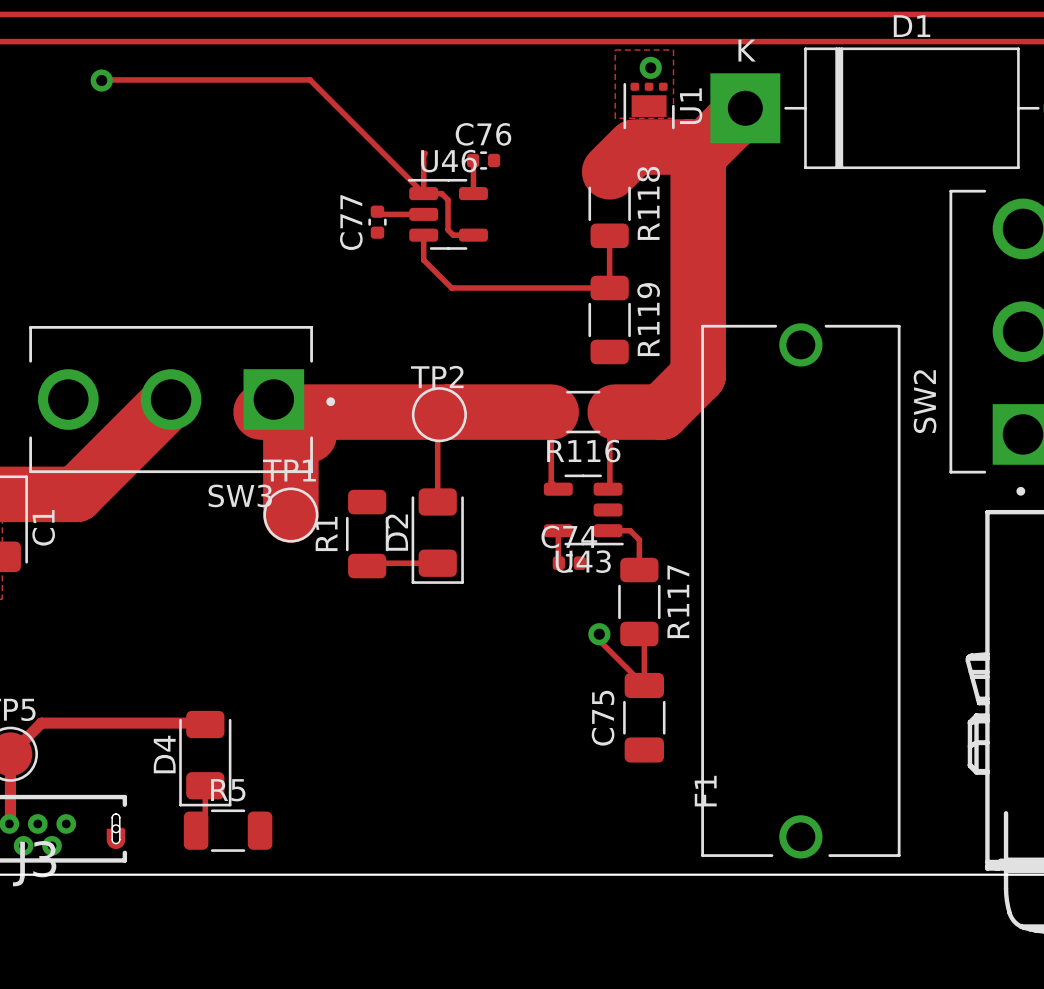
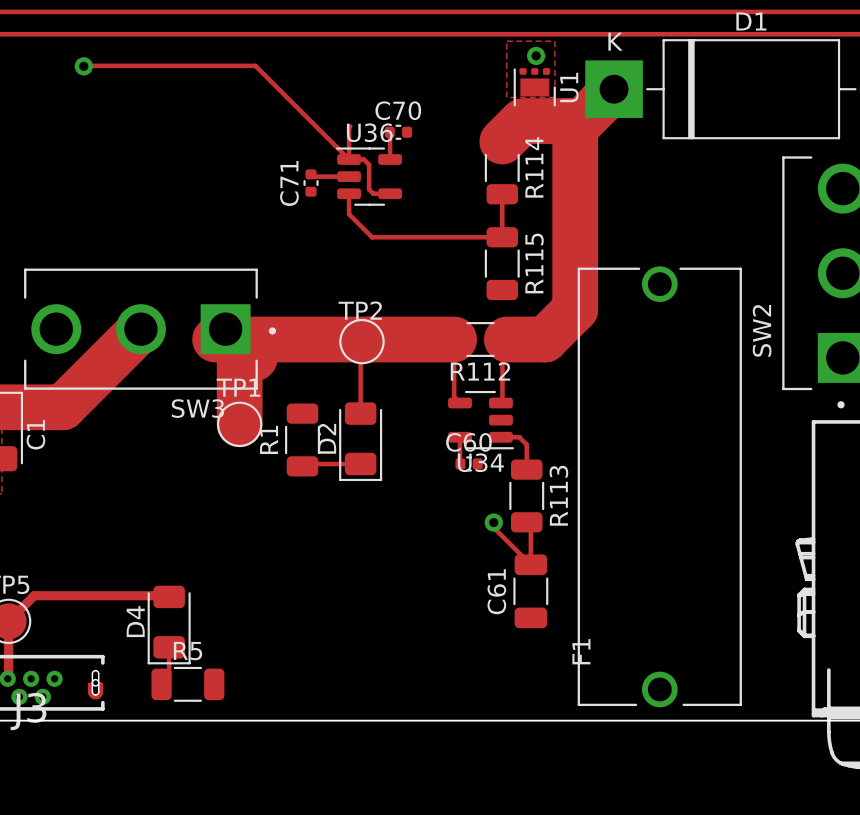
C76 name: C76 (483, 134) -> C70 (398, 110)
U46 name: U46 (448, 161) -> U36 (369, 132)
R118 name: R118 (648, 203) -> R114 (534, 167)
C77 name: C77 (351, 222) -> C71 (289, 183)
R119 name: R119 (648, 319) -> R115 (534, 263)
R116 name: R116 (583, 451) -> R112 (480, 371)
C74 name: C74 (569, 536) -> C60 (468, 442)
U43 name: U43 (583, 561) -> U34 (480, 462)
R117 name: R117 (678, 601) -> R113 (558, 495)
C75 name: C75 (603, 718) -> C61 (496, 591)

